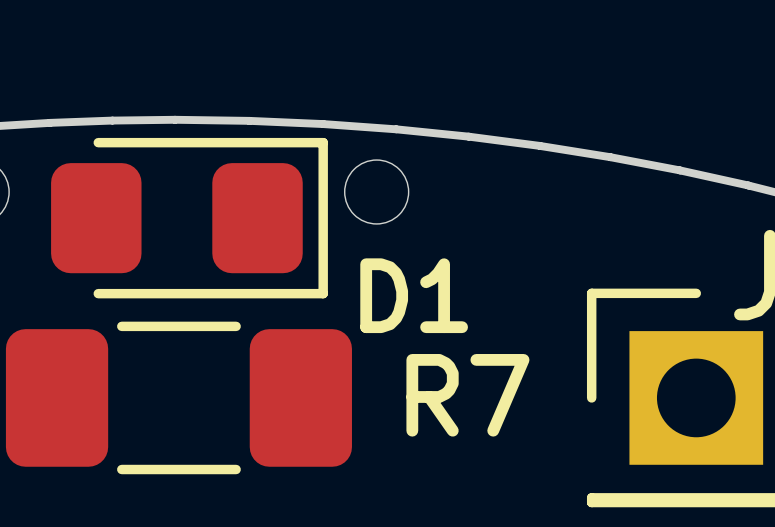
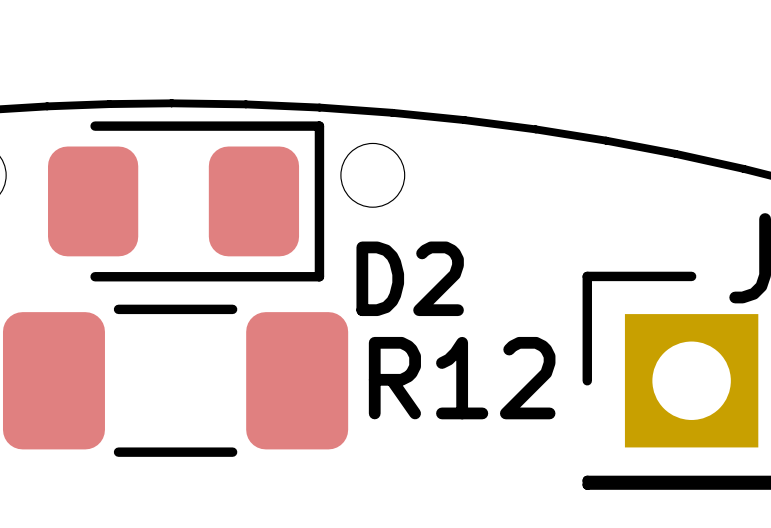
D1 name: D1 (414, 295) -> D2 (410, 278)
R7 name: R7 (467, 395) -> R12 (462, 378)

